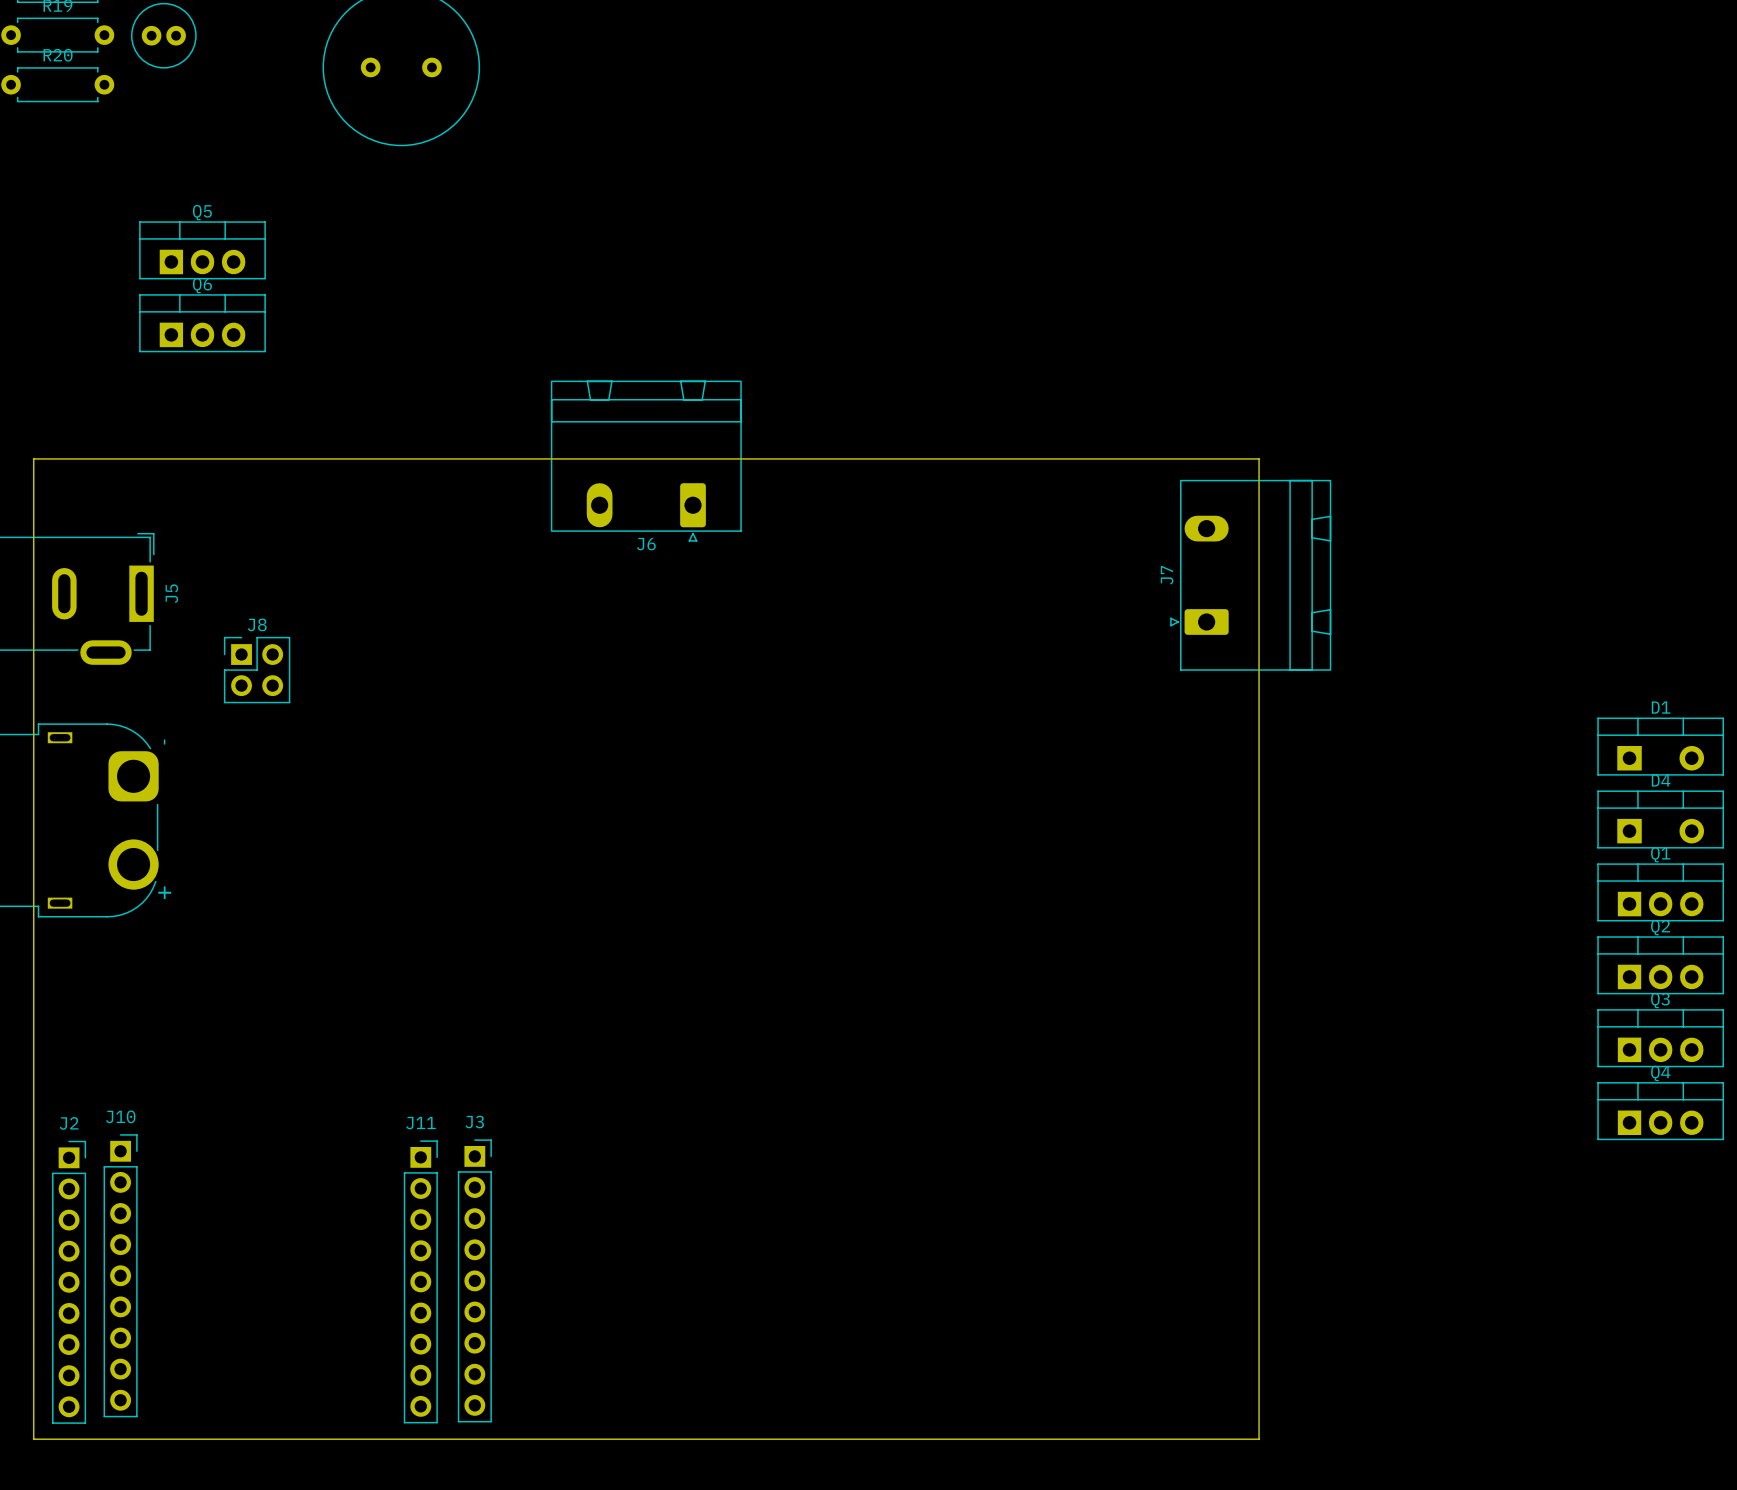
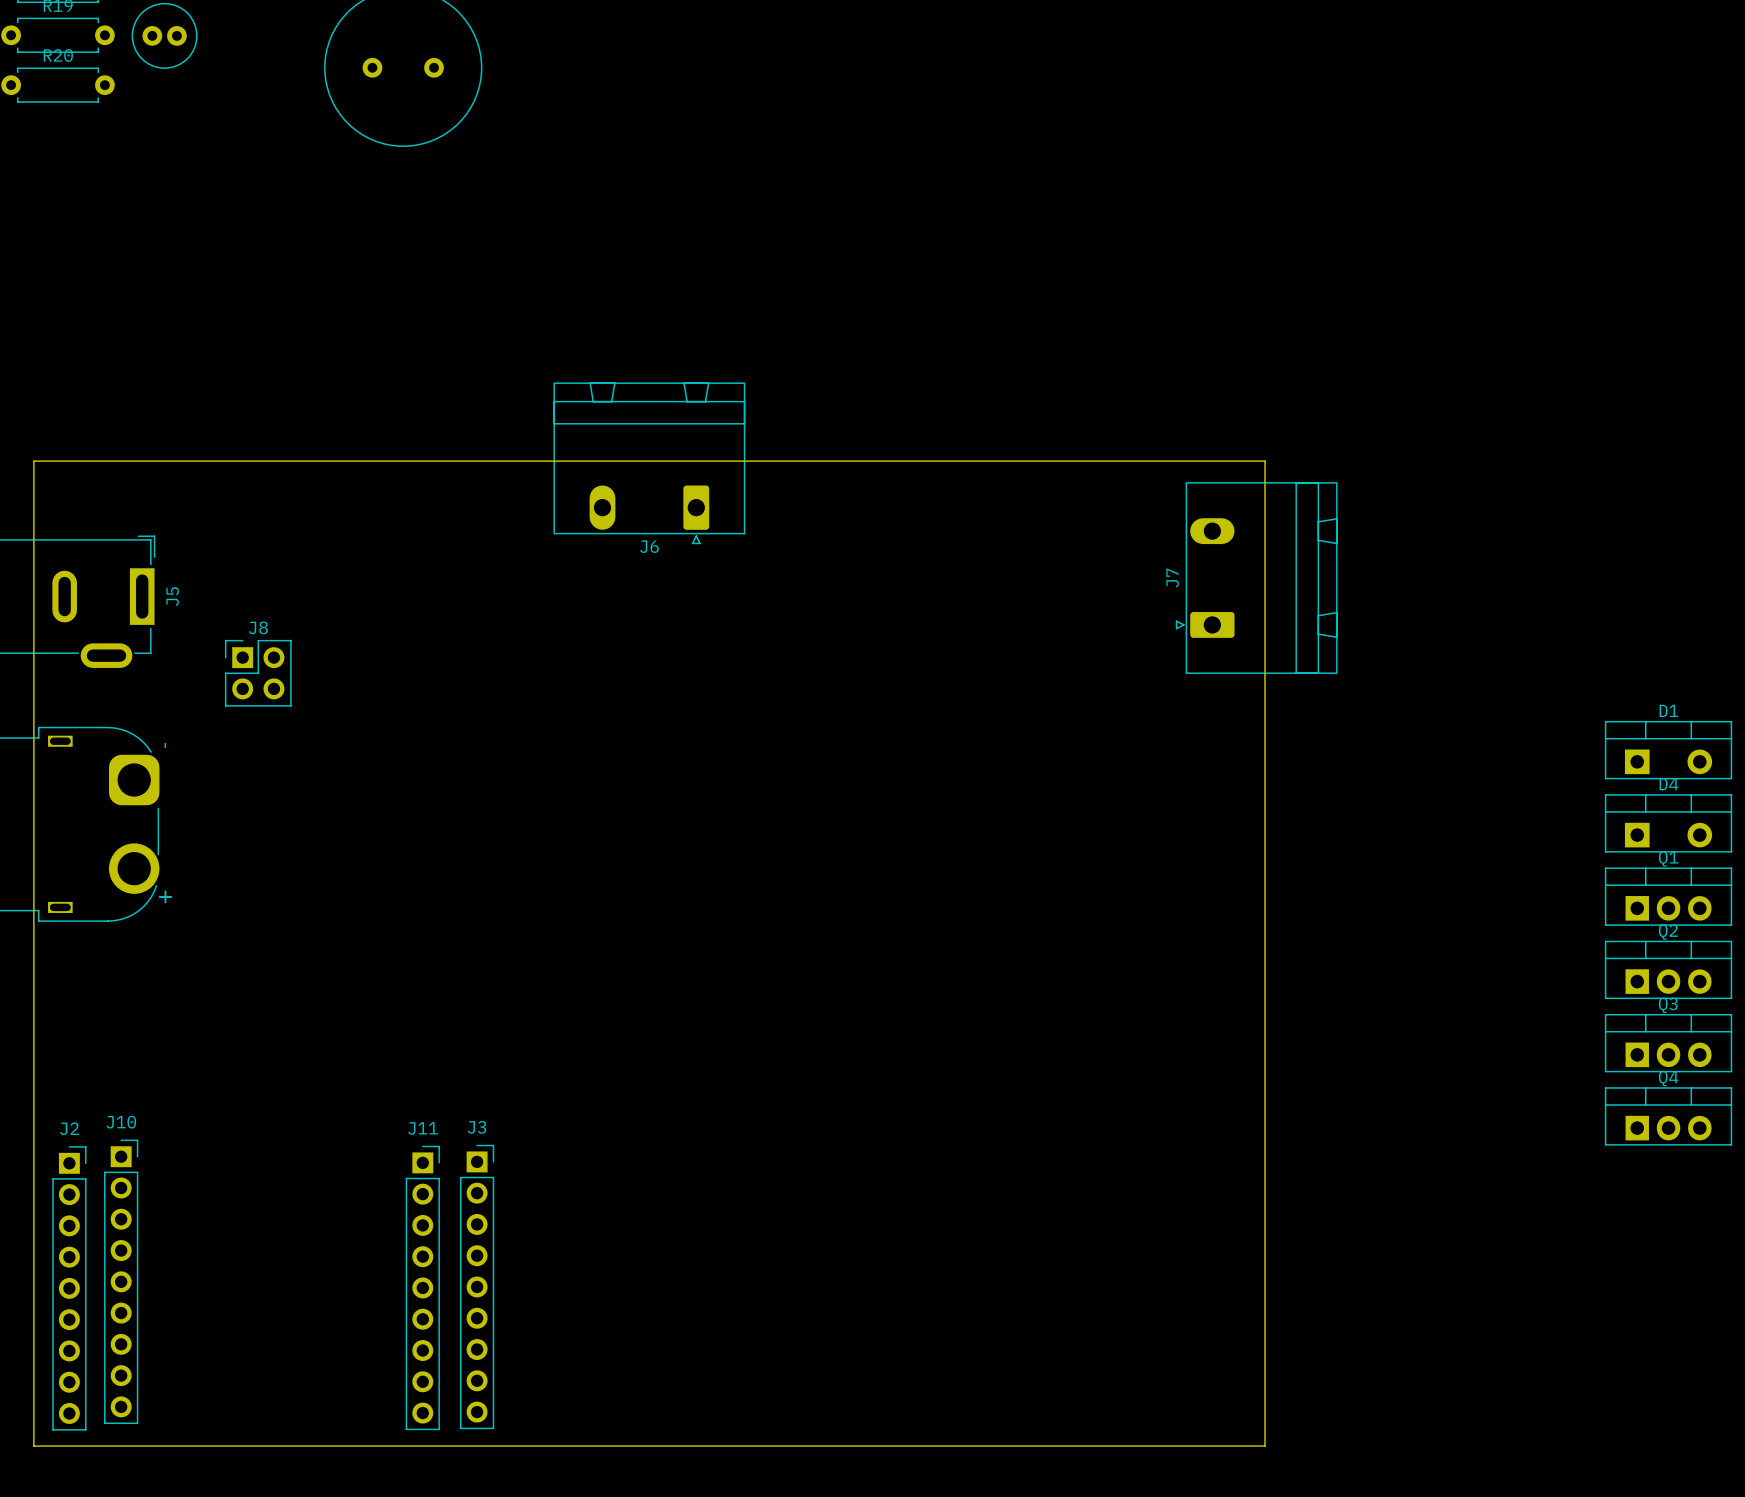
Q5: (202, 250) -> none
Q6: (202, 323) -> none

